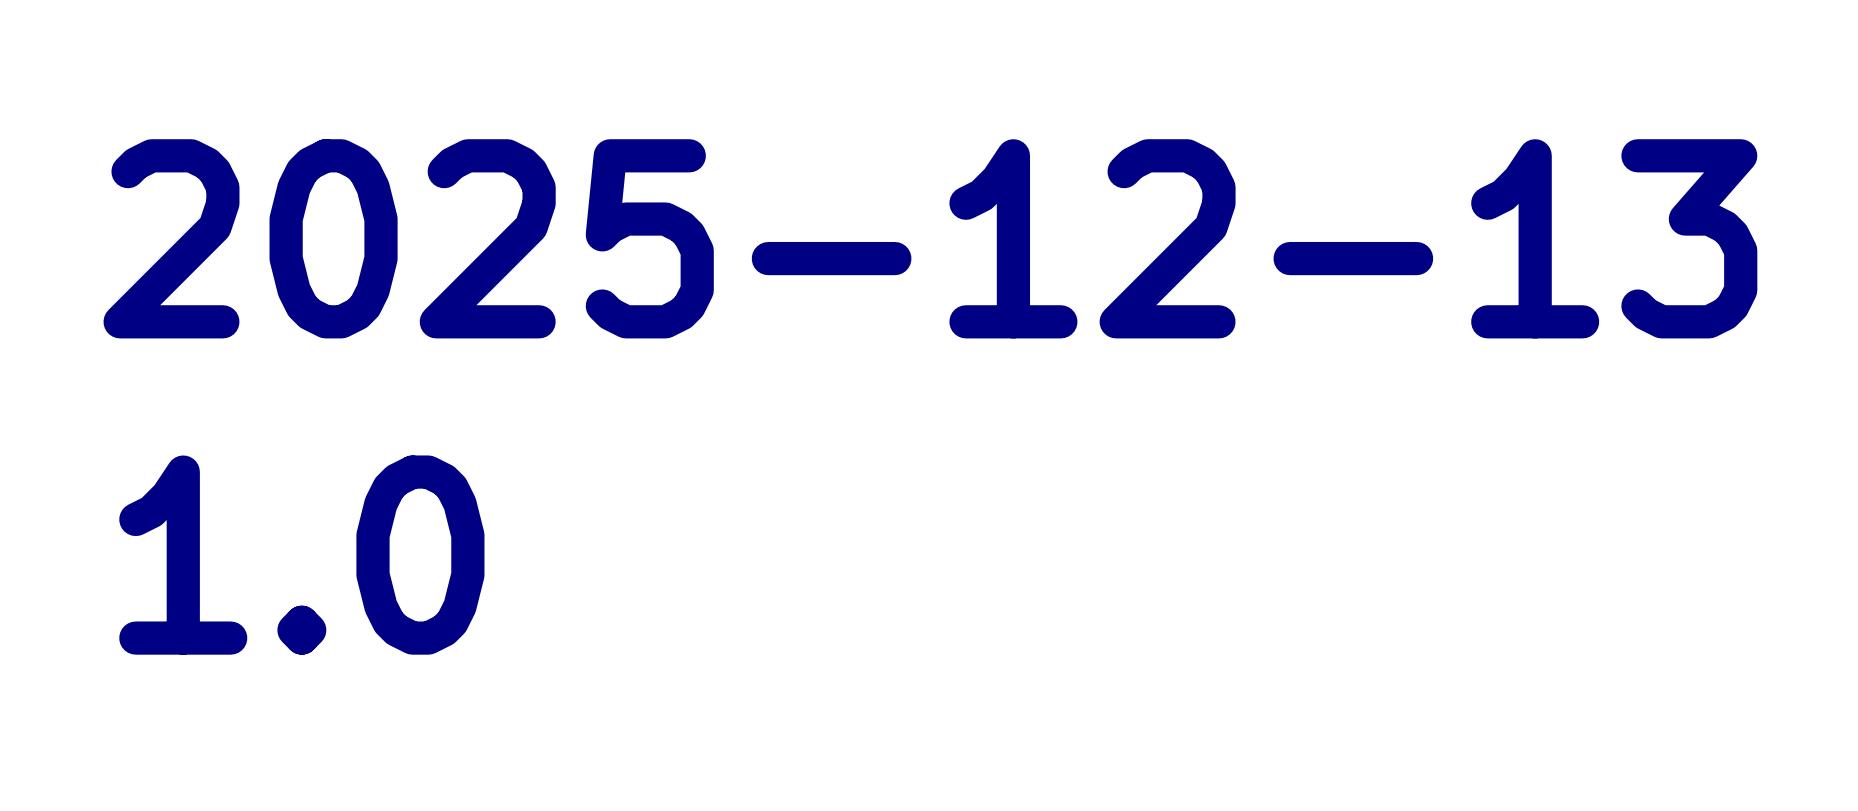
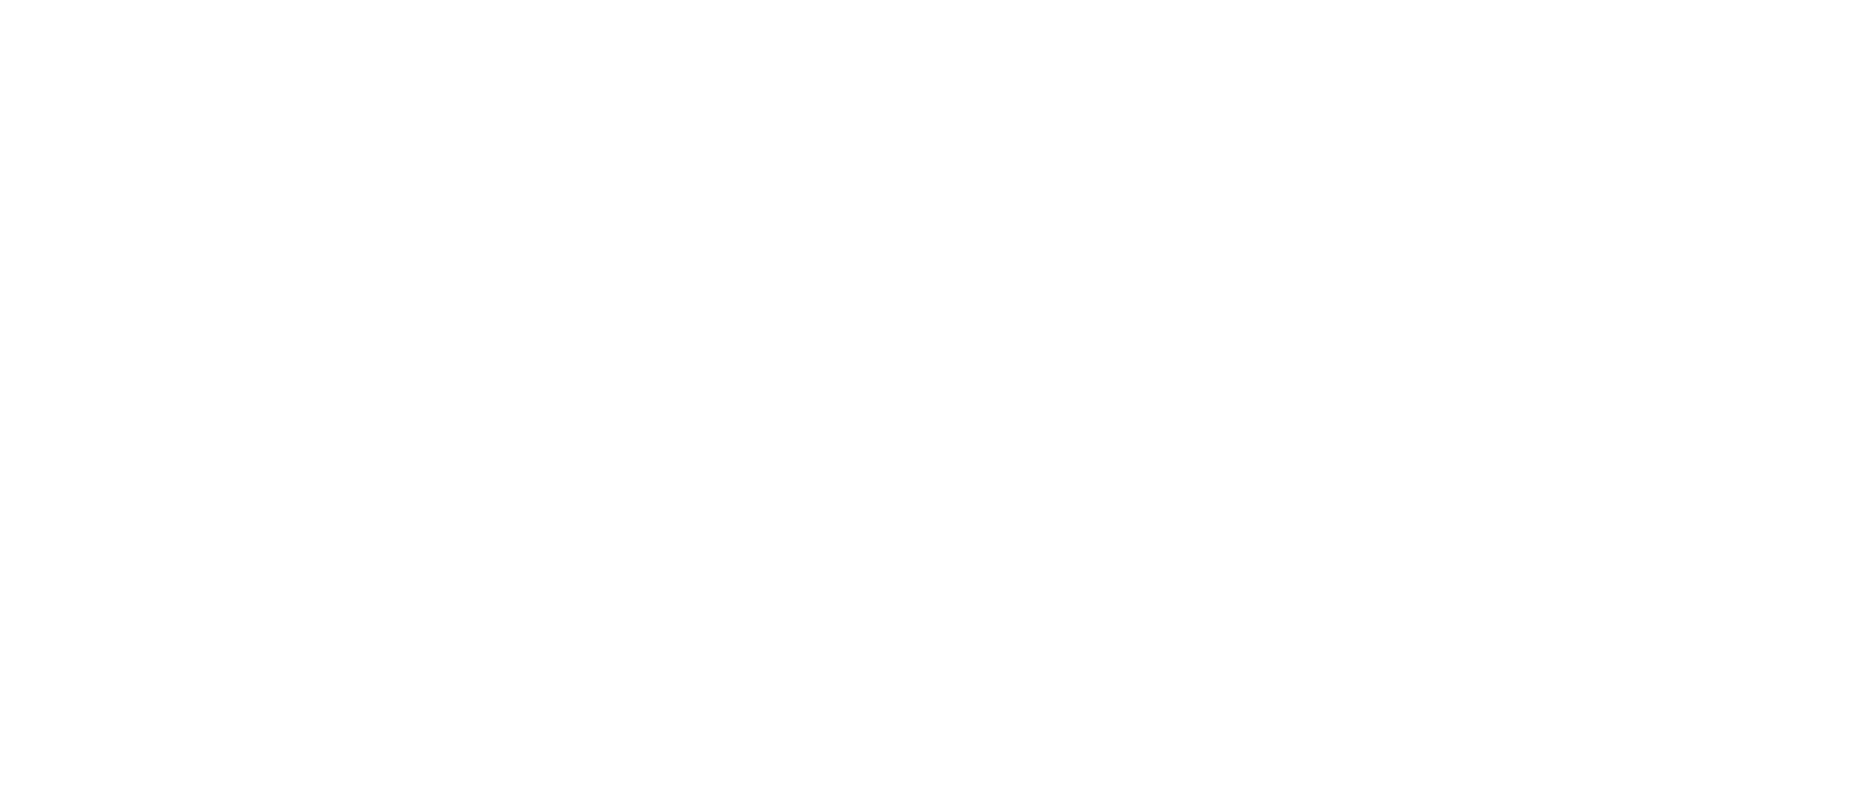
text: 2025-12-13 (930, 238) -> none
text: 1.0 (301, 555) -> none

